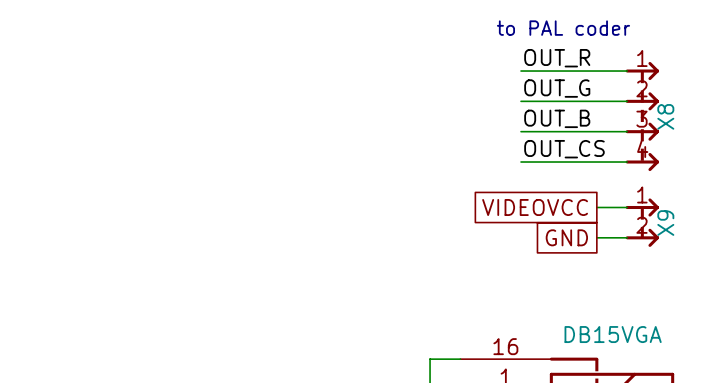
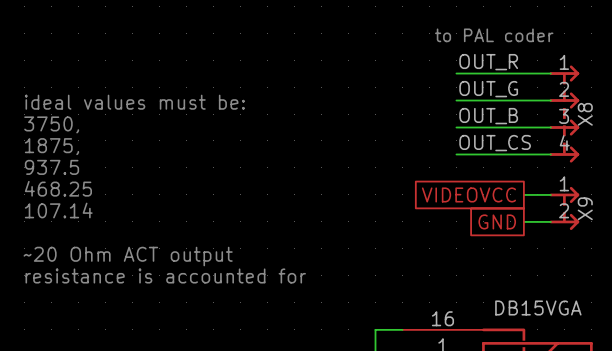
text: none -> ideal values must be: (134, 102)
text: none -> 3750, (51, 124)
text: none -> 1875, (51, 146)
text: none -> 937.5 (51, 167)
text: none -> 468.25 (58, 188)
text: none -> 107.14 (58, 210)
text: none -> ~20 Ohm ACT output (128, 256)
text: none -> resistance is accounted for (165, 275)

